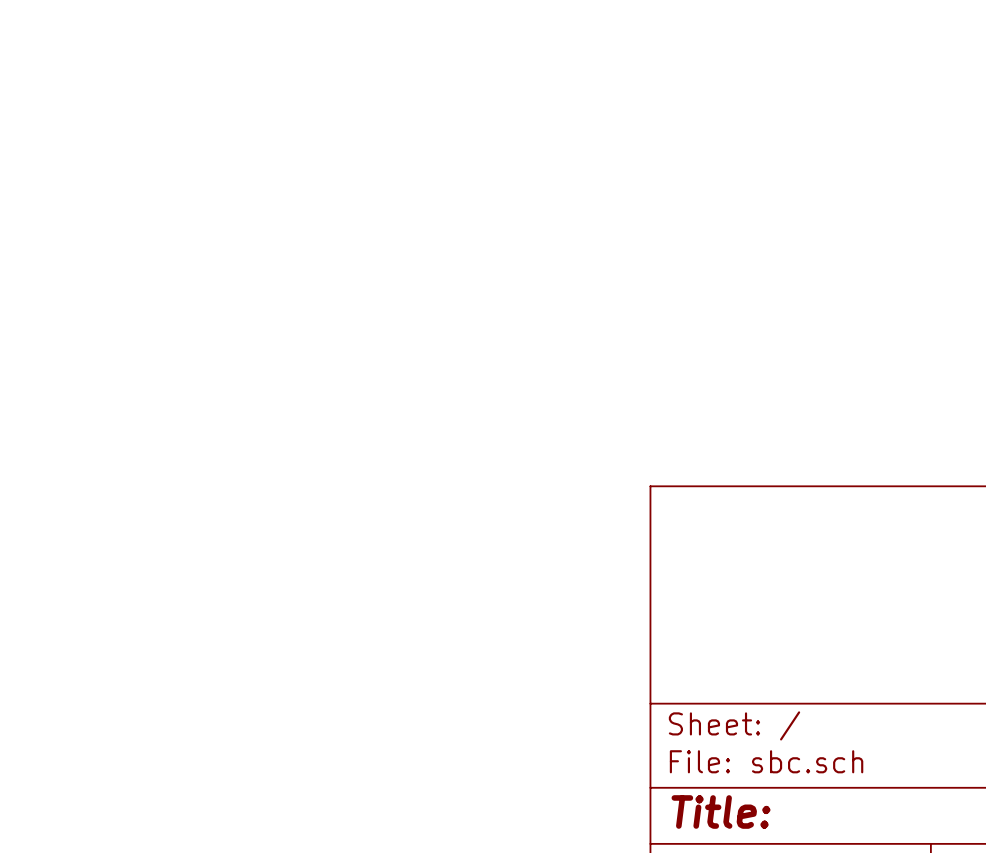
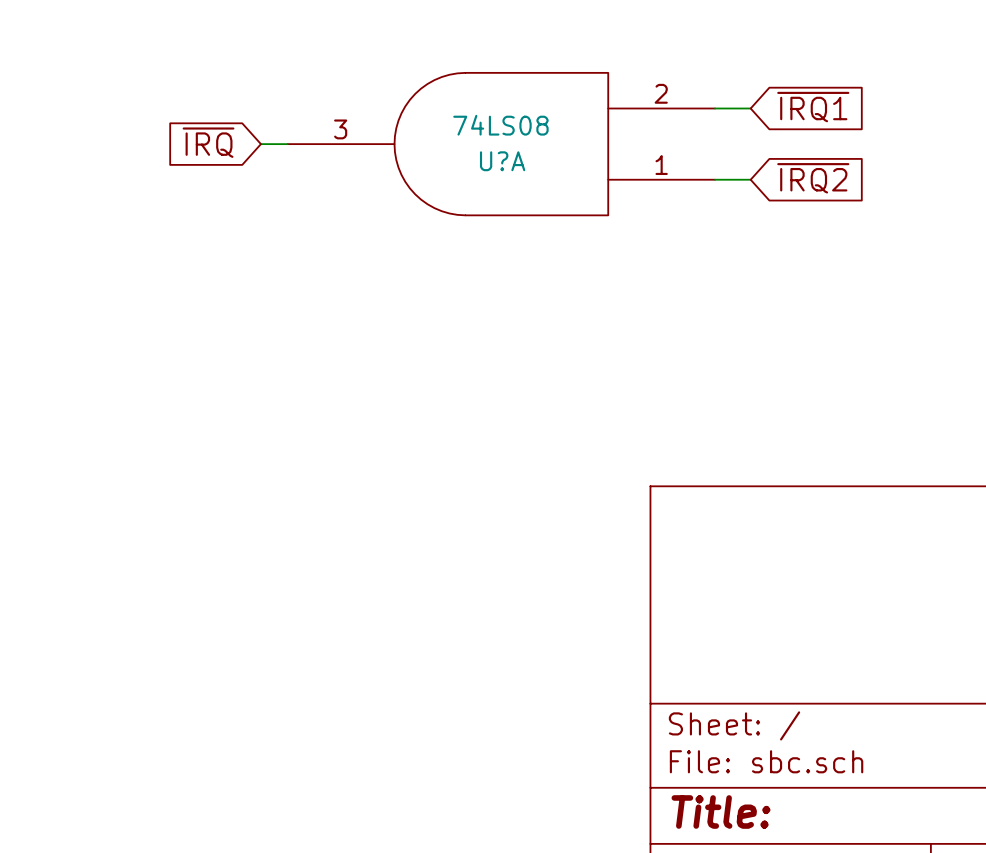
global label: none -> ~{IRQ1} (813, 107)
wire: none -> (715, 108) (750, 108)
global label: none -> ~{IRQ} (208, 142)
wire: none -> (260, 144) (287, 144)
U?A: none -> 74LS08 (501, 144)
global label: none -> ~{IRQ2} (813, 178)
wire: none -> (715, 179) (750, 179)

